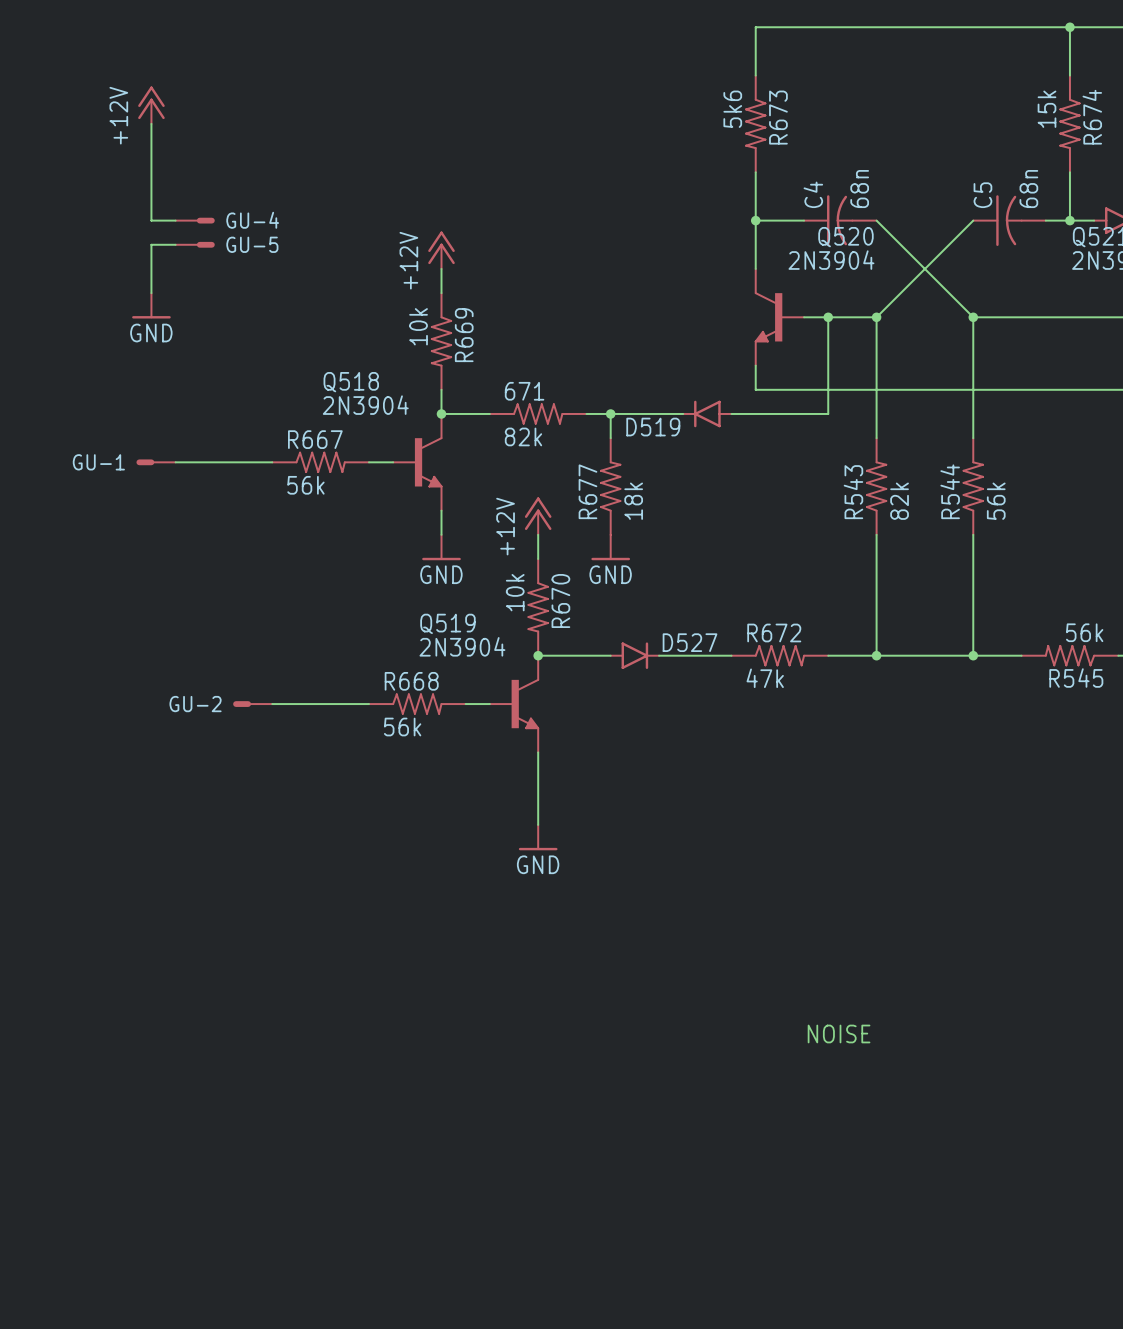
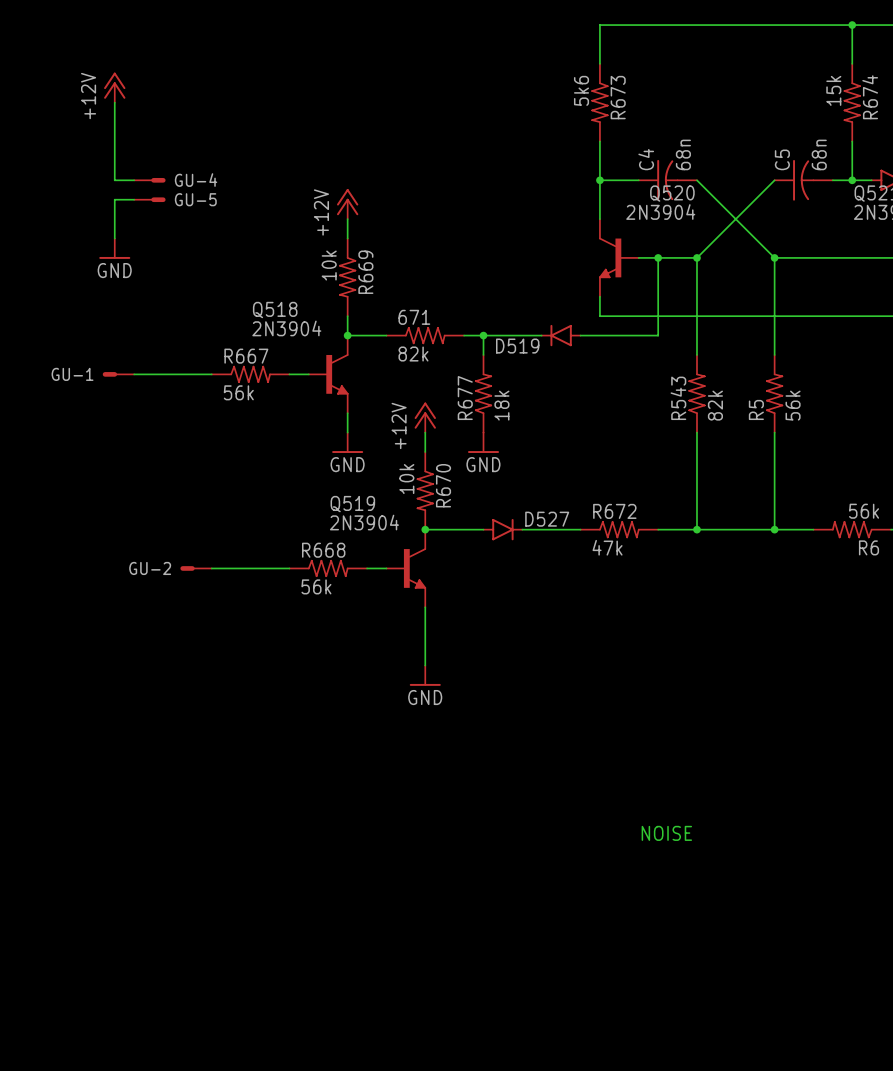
R544 name: R544 (950, 491) -> R5 (756, 409)
R545 name: R545 (1076, 678) -> R6 (869, 547)

